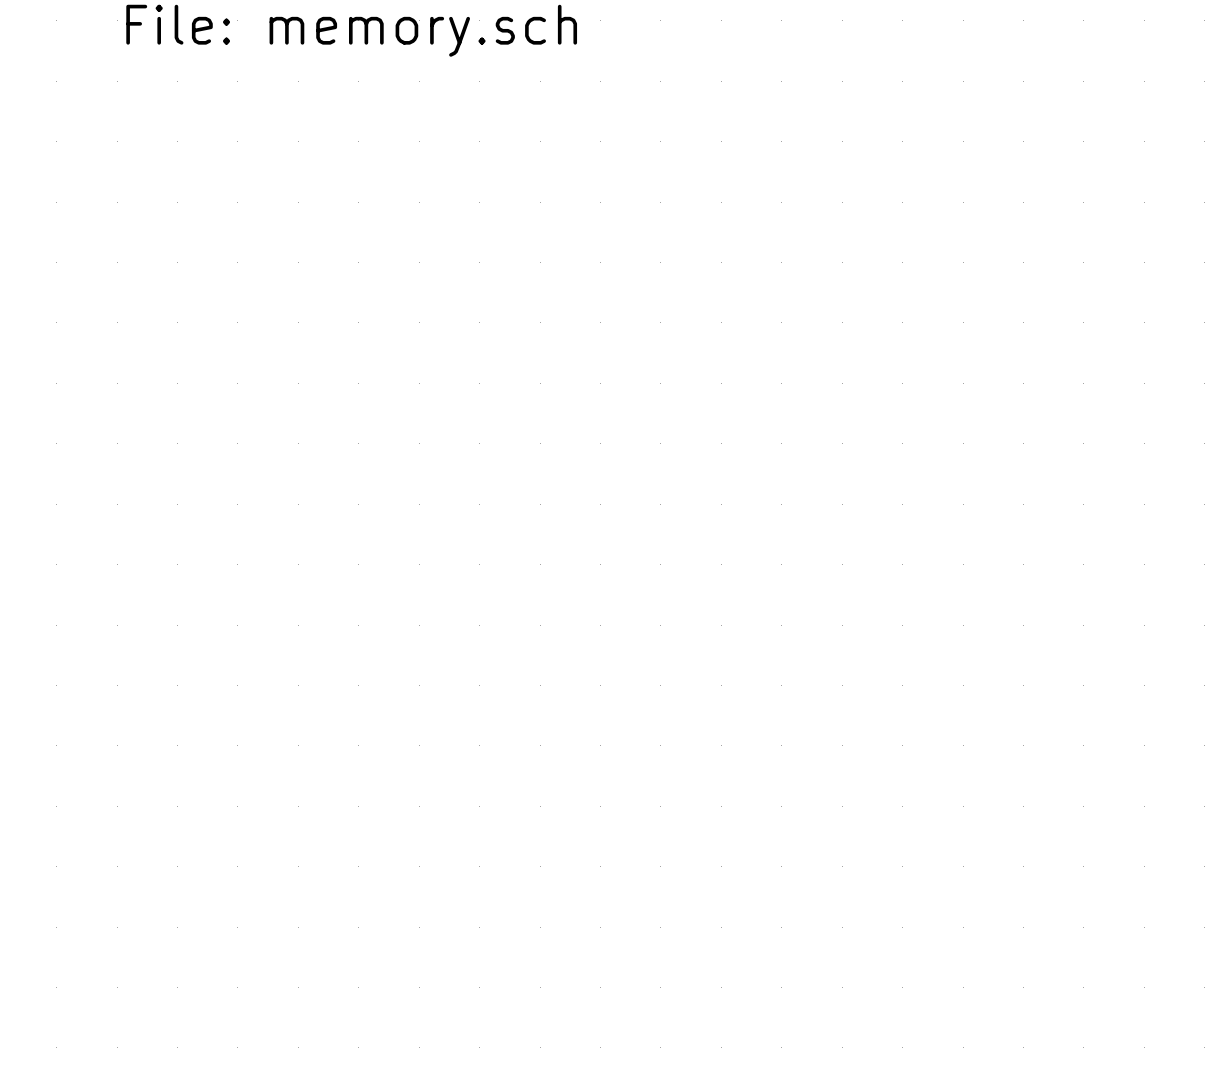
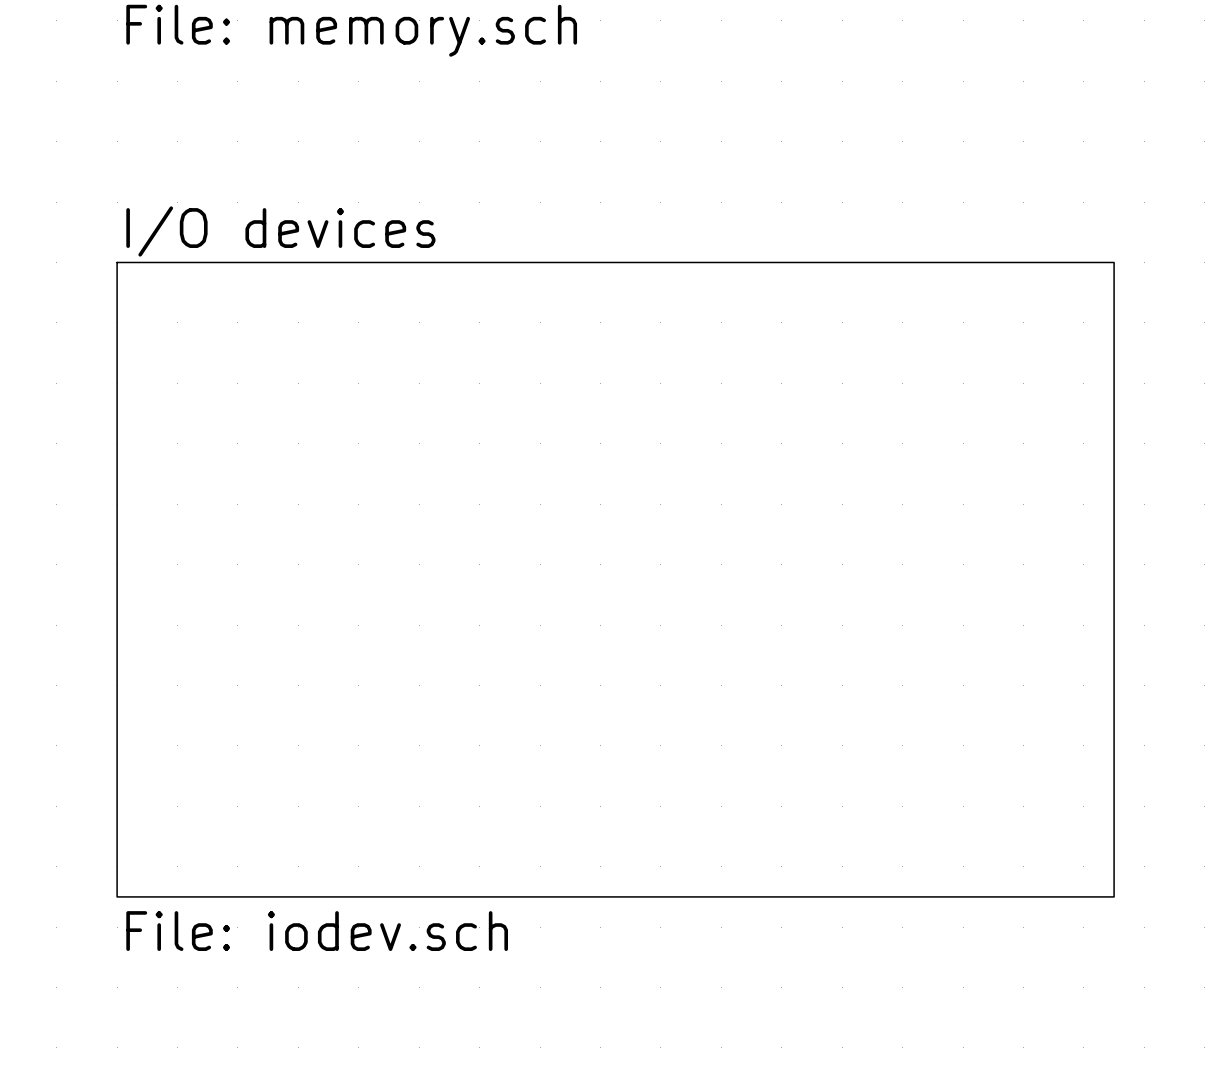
sheet I/O devices: none -> File: iodev.sch (615, 579)

